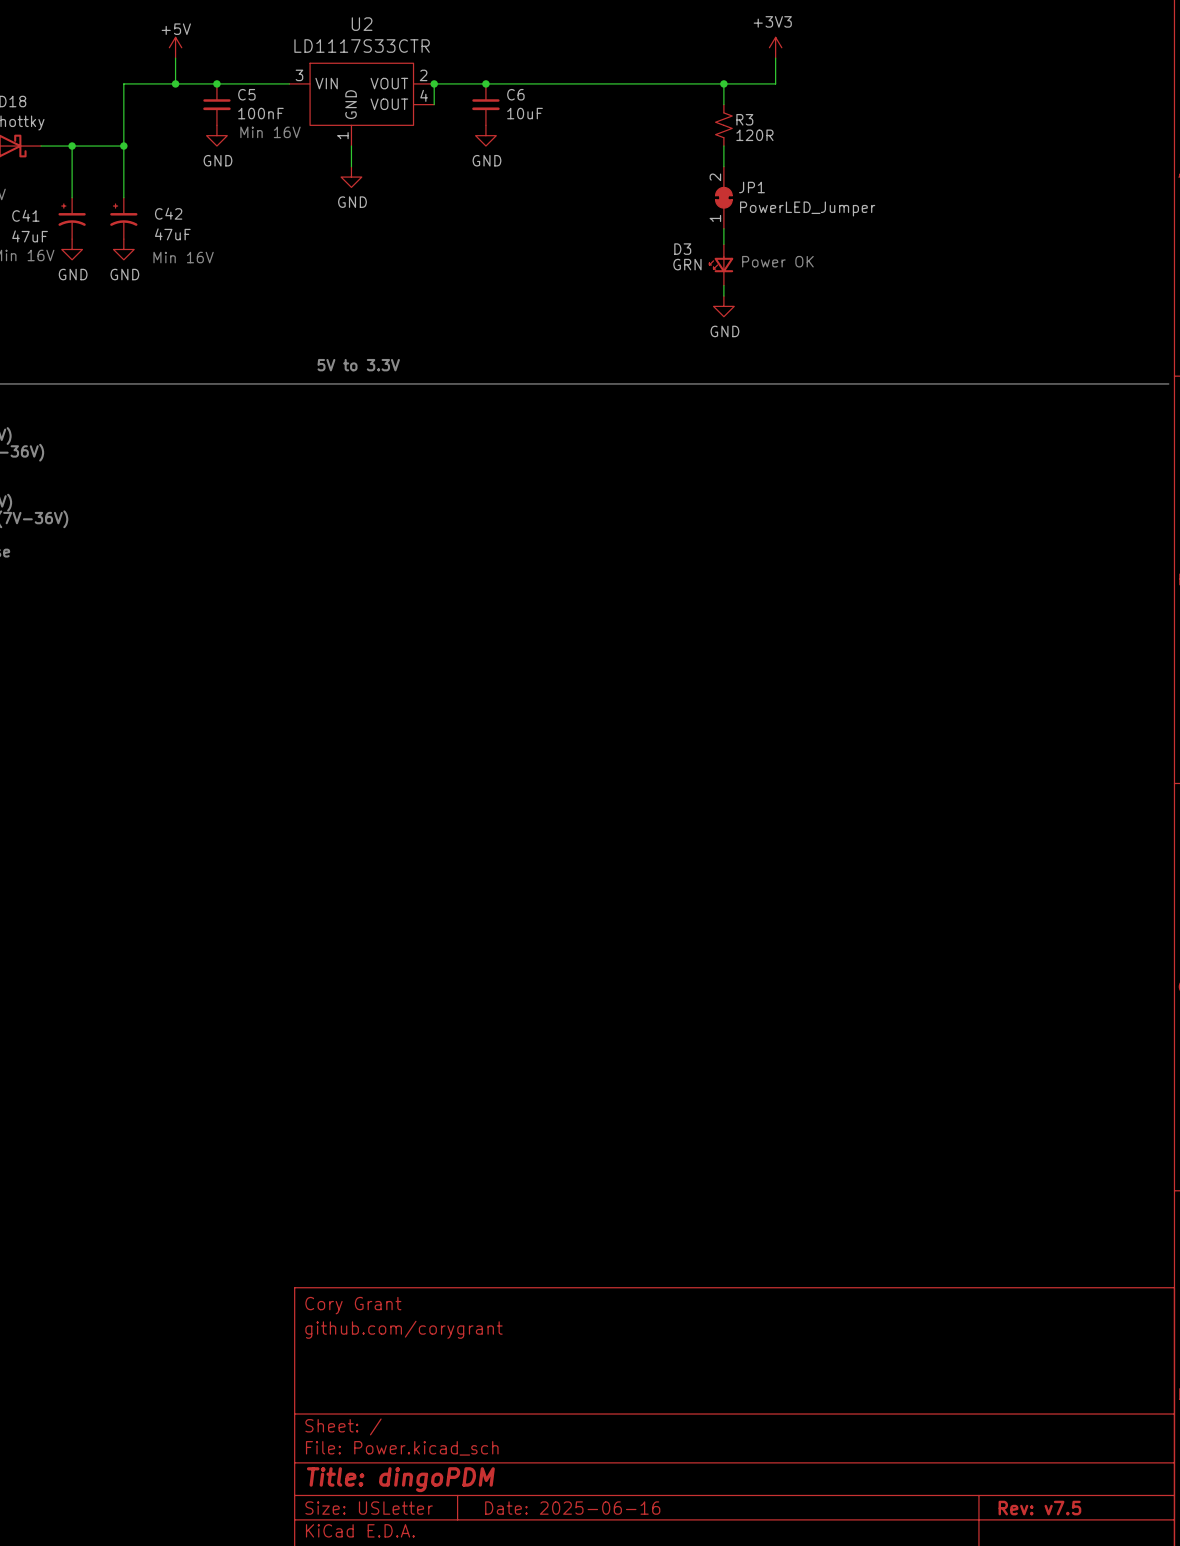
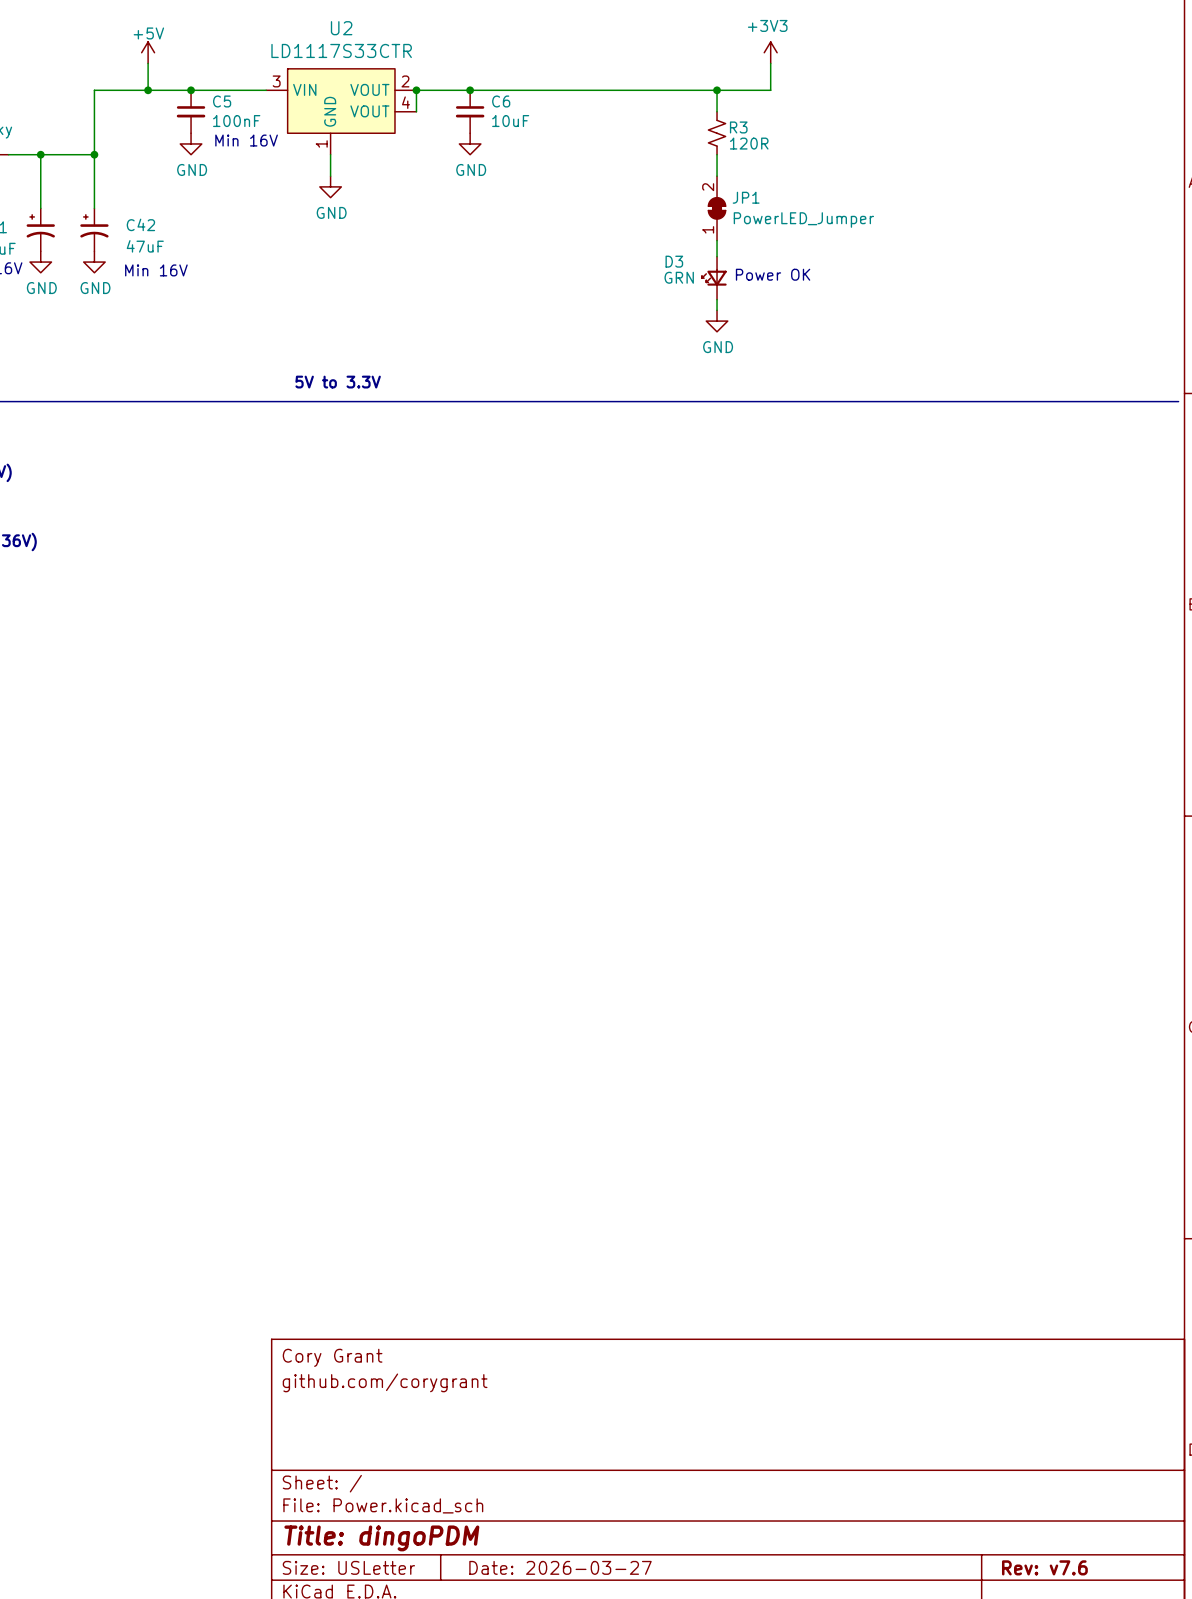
title block: Date: 2025-06-16 (572, 1508) -> Date: 2026-03-27 (560, 1567)
title block: Rev: v7.5 (1039, 1508) -> Rev: v7.6 (1044, 1567)

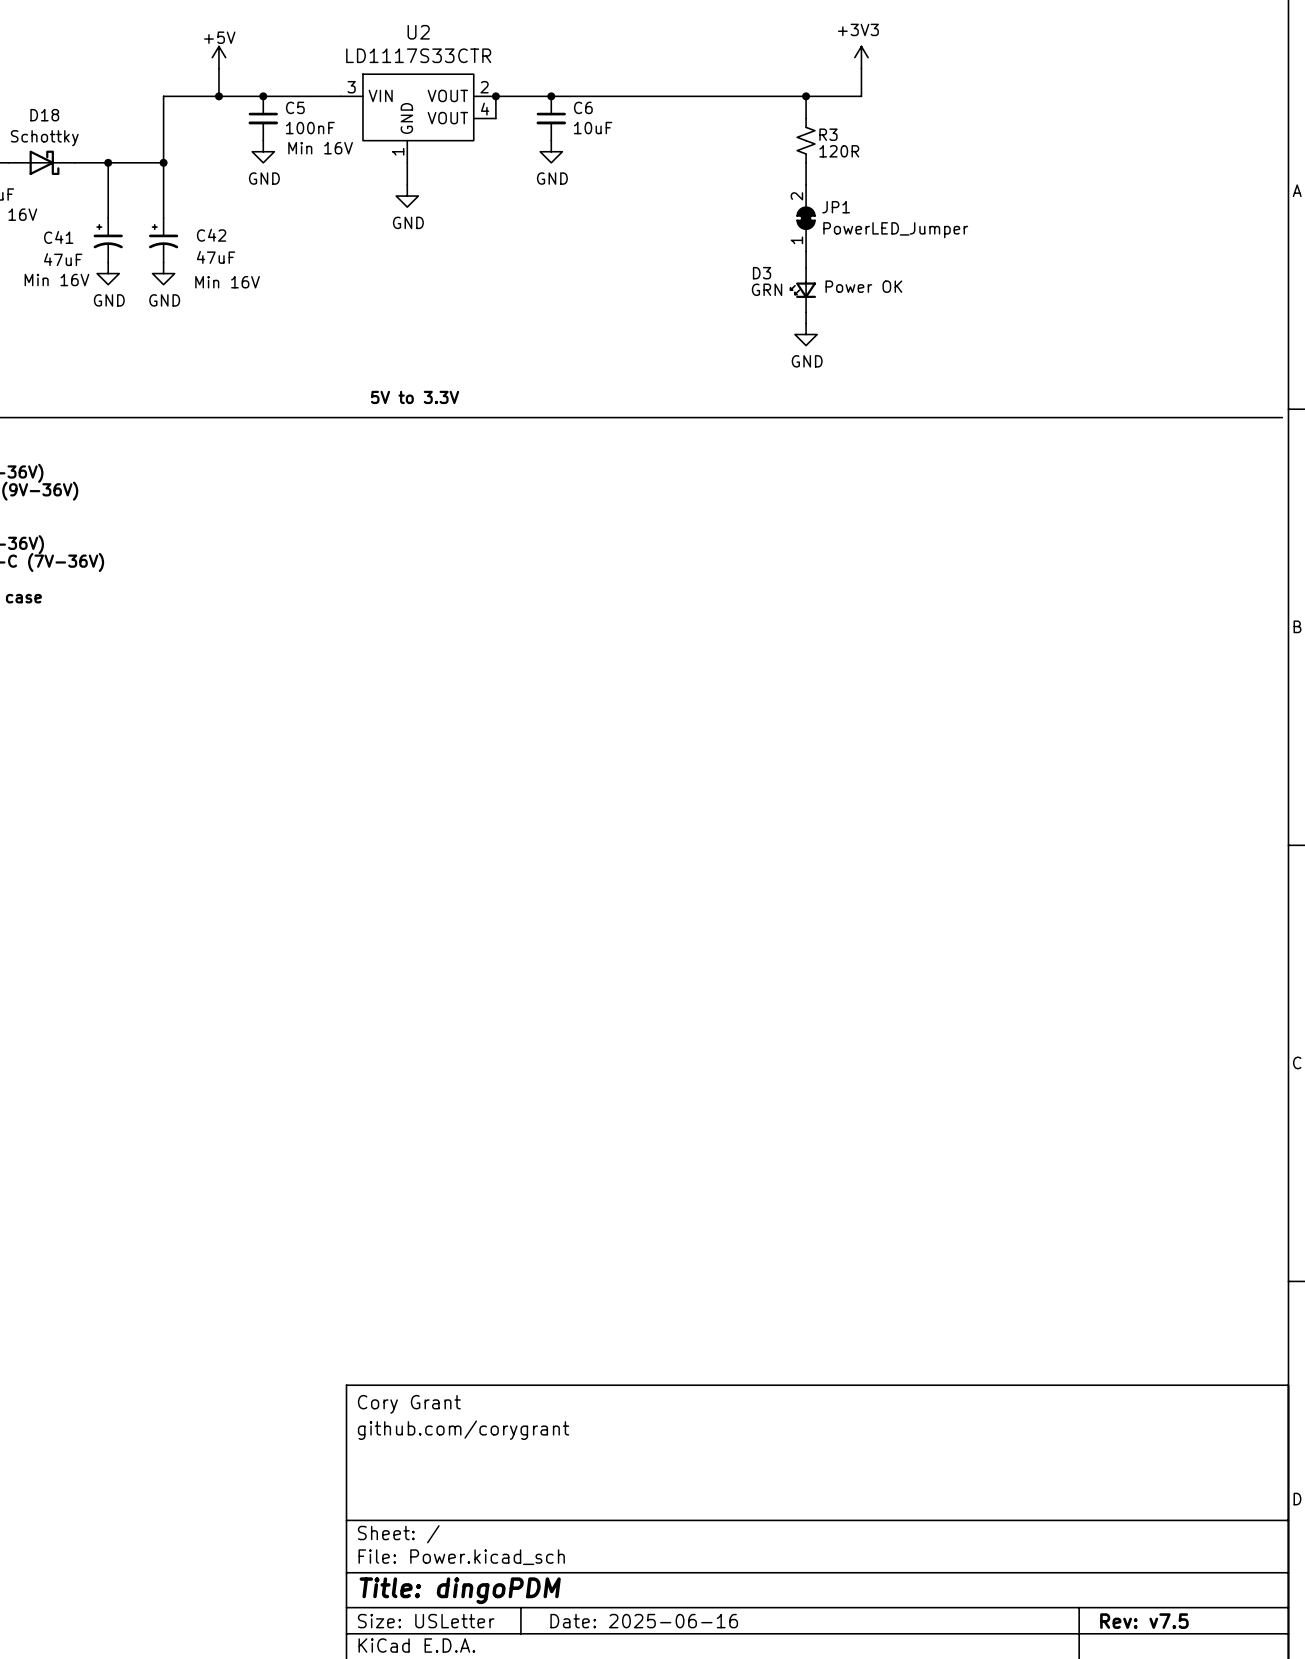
title block: Date: 2026-03-27 (560, 1567) -> Date: 2025-06-16 (644, 1621)
title block: Rev: v7.6 (1044, 1567) -> Rev: v7.5 (1144, 1621)

